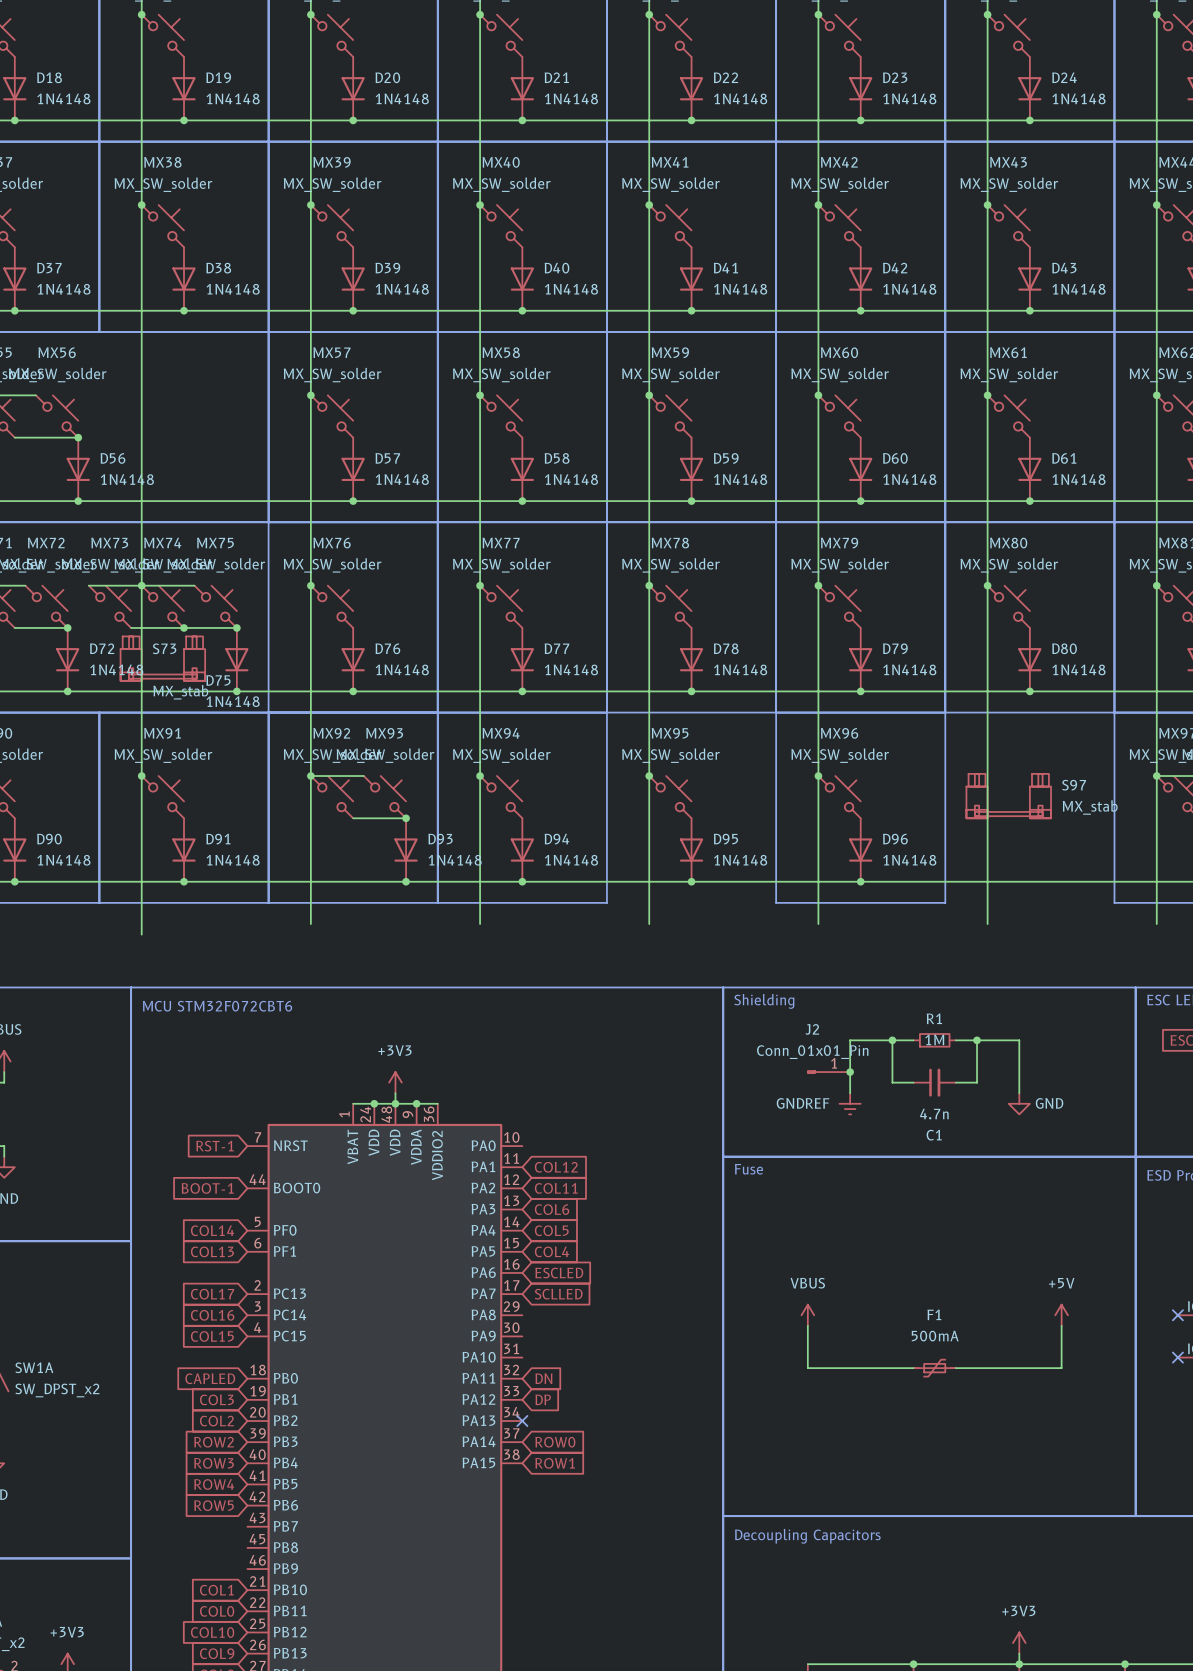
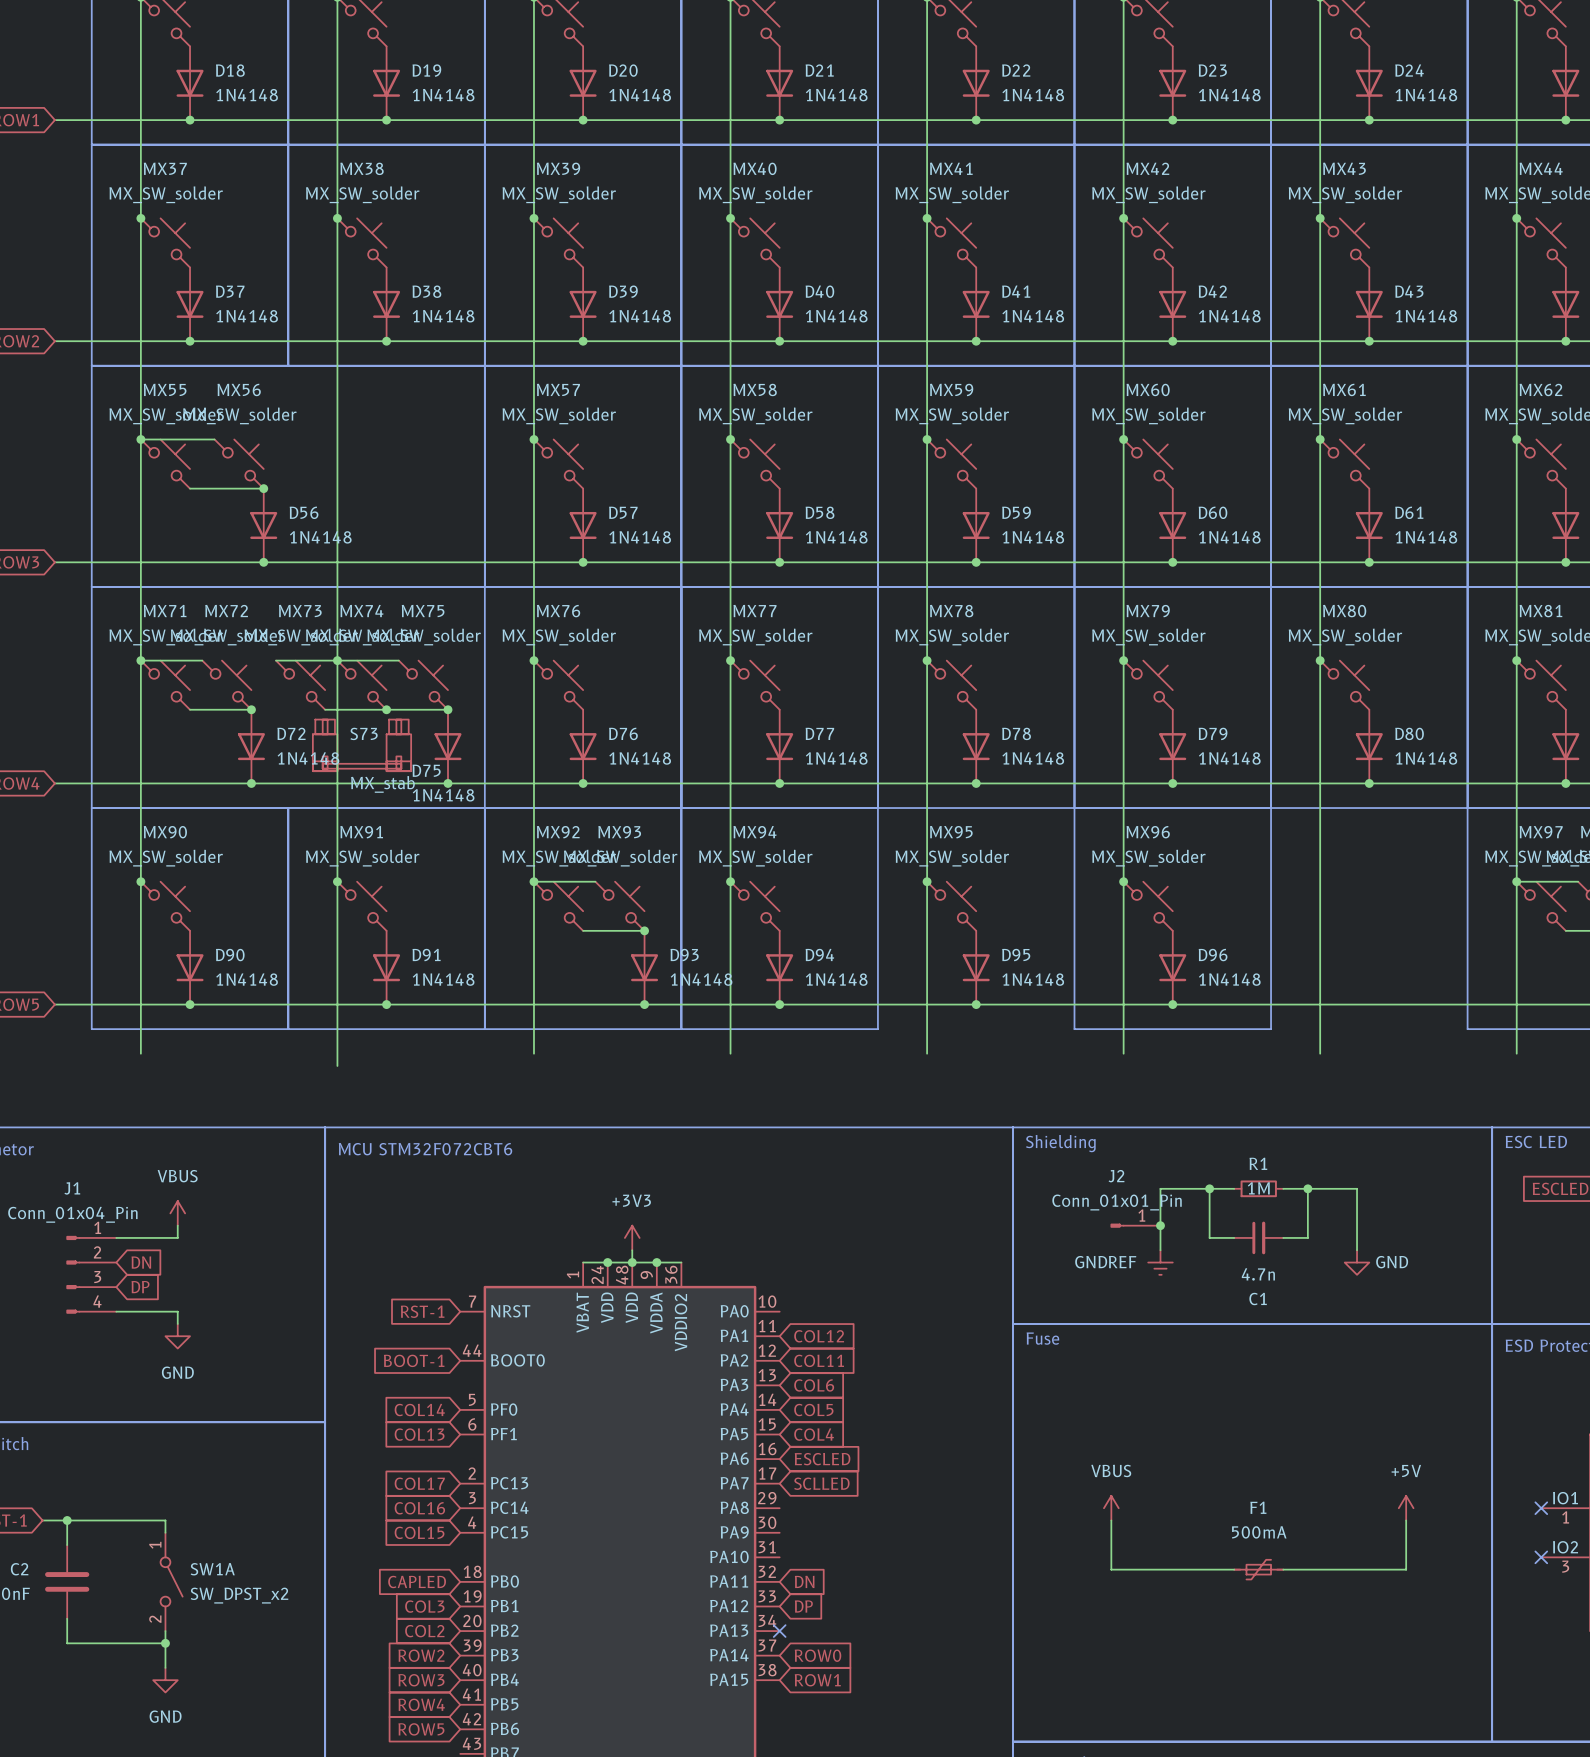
S97: MX_stab (1008, 796) -> none

